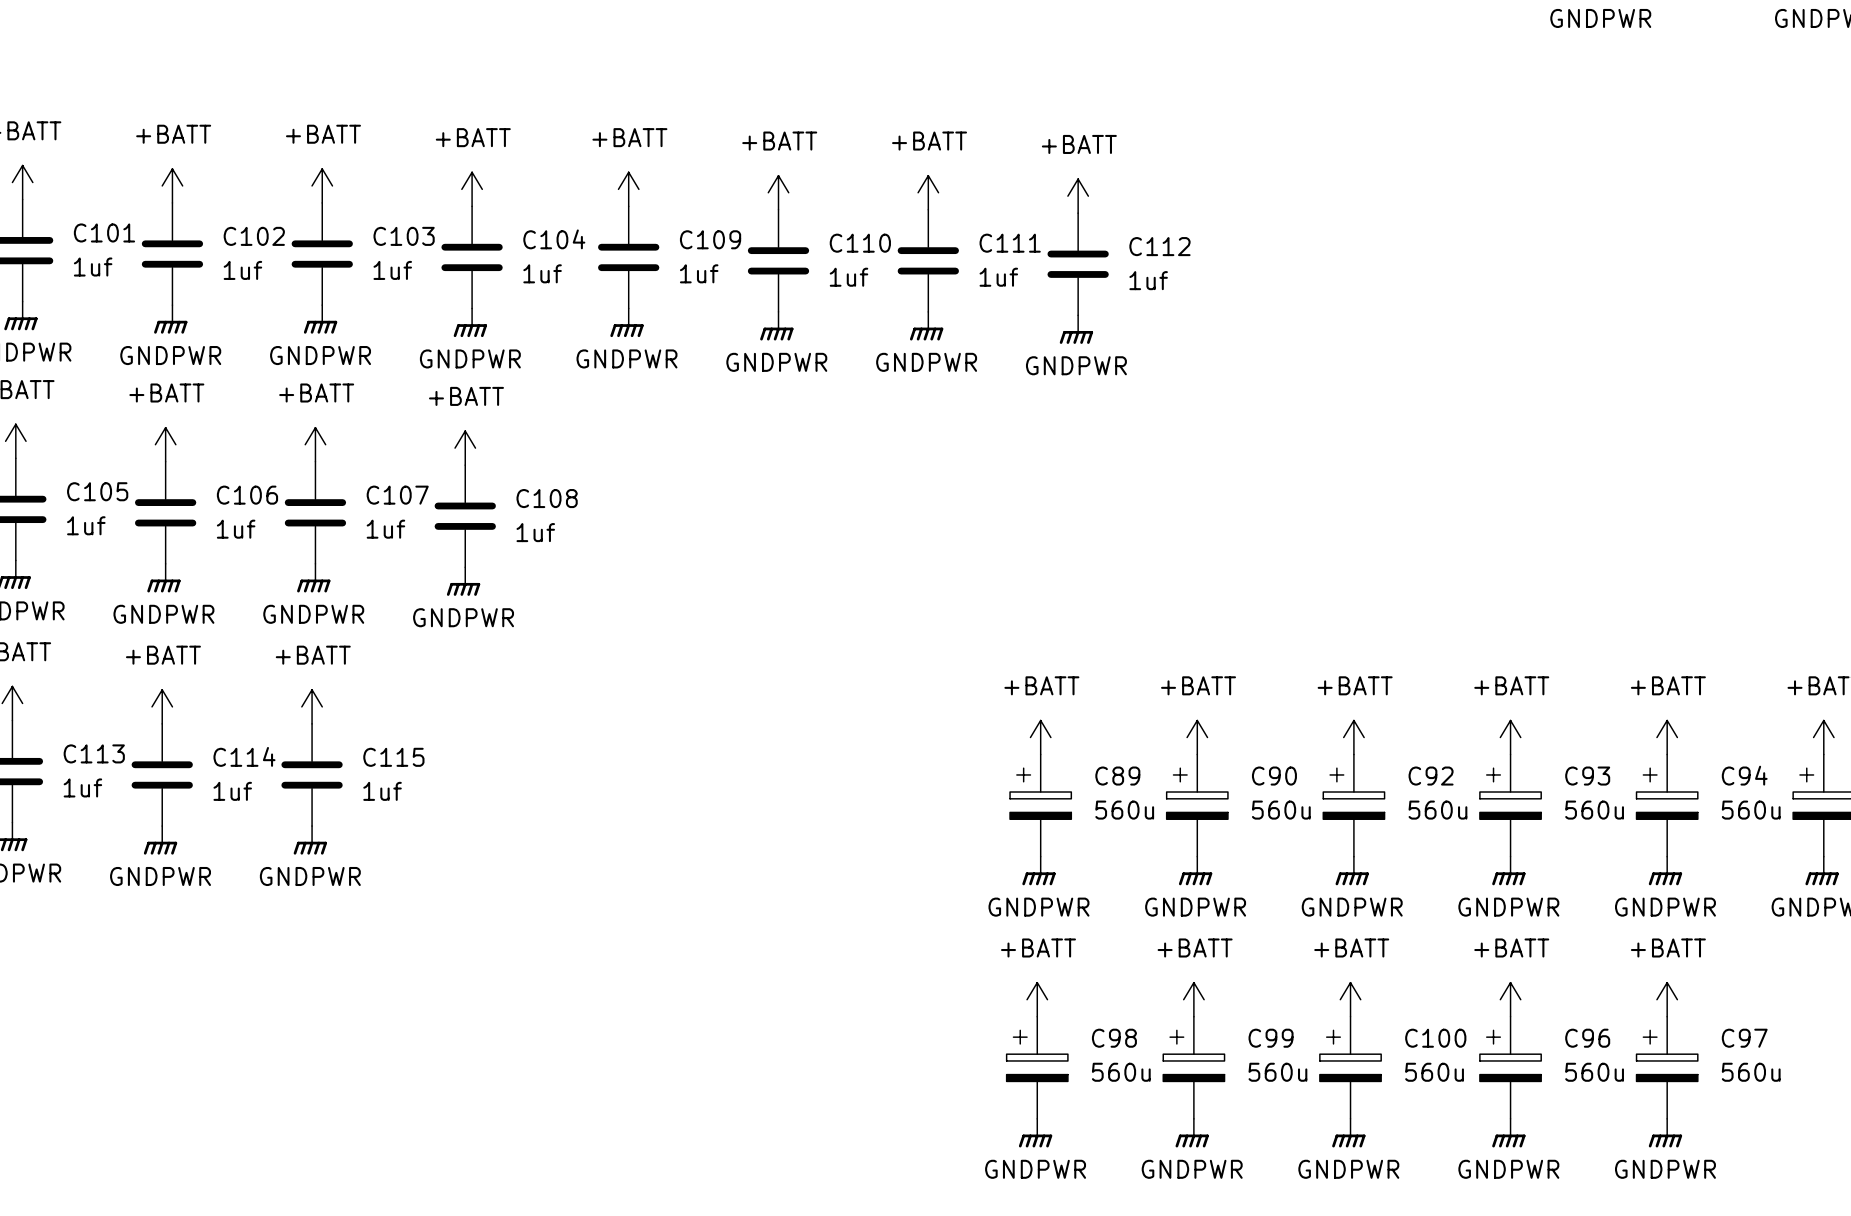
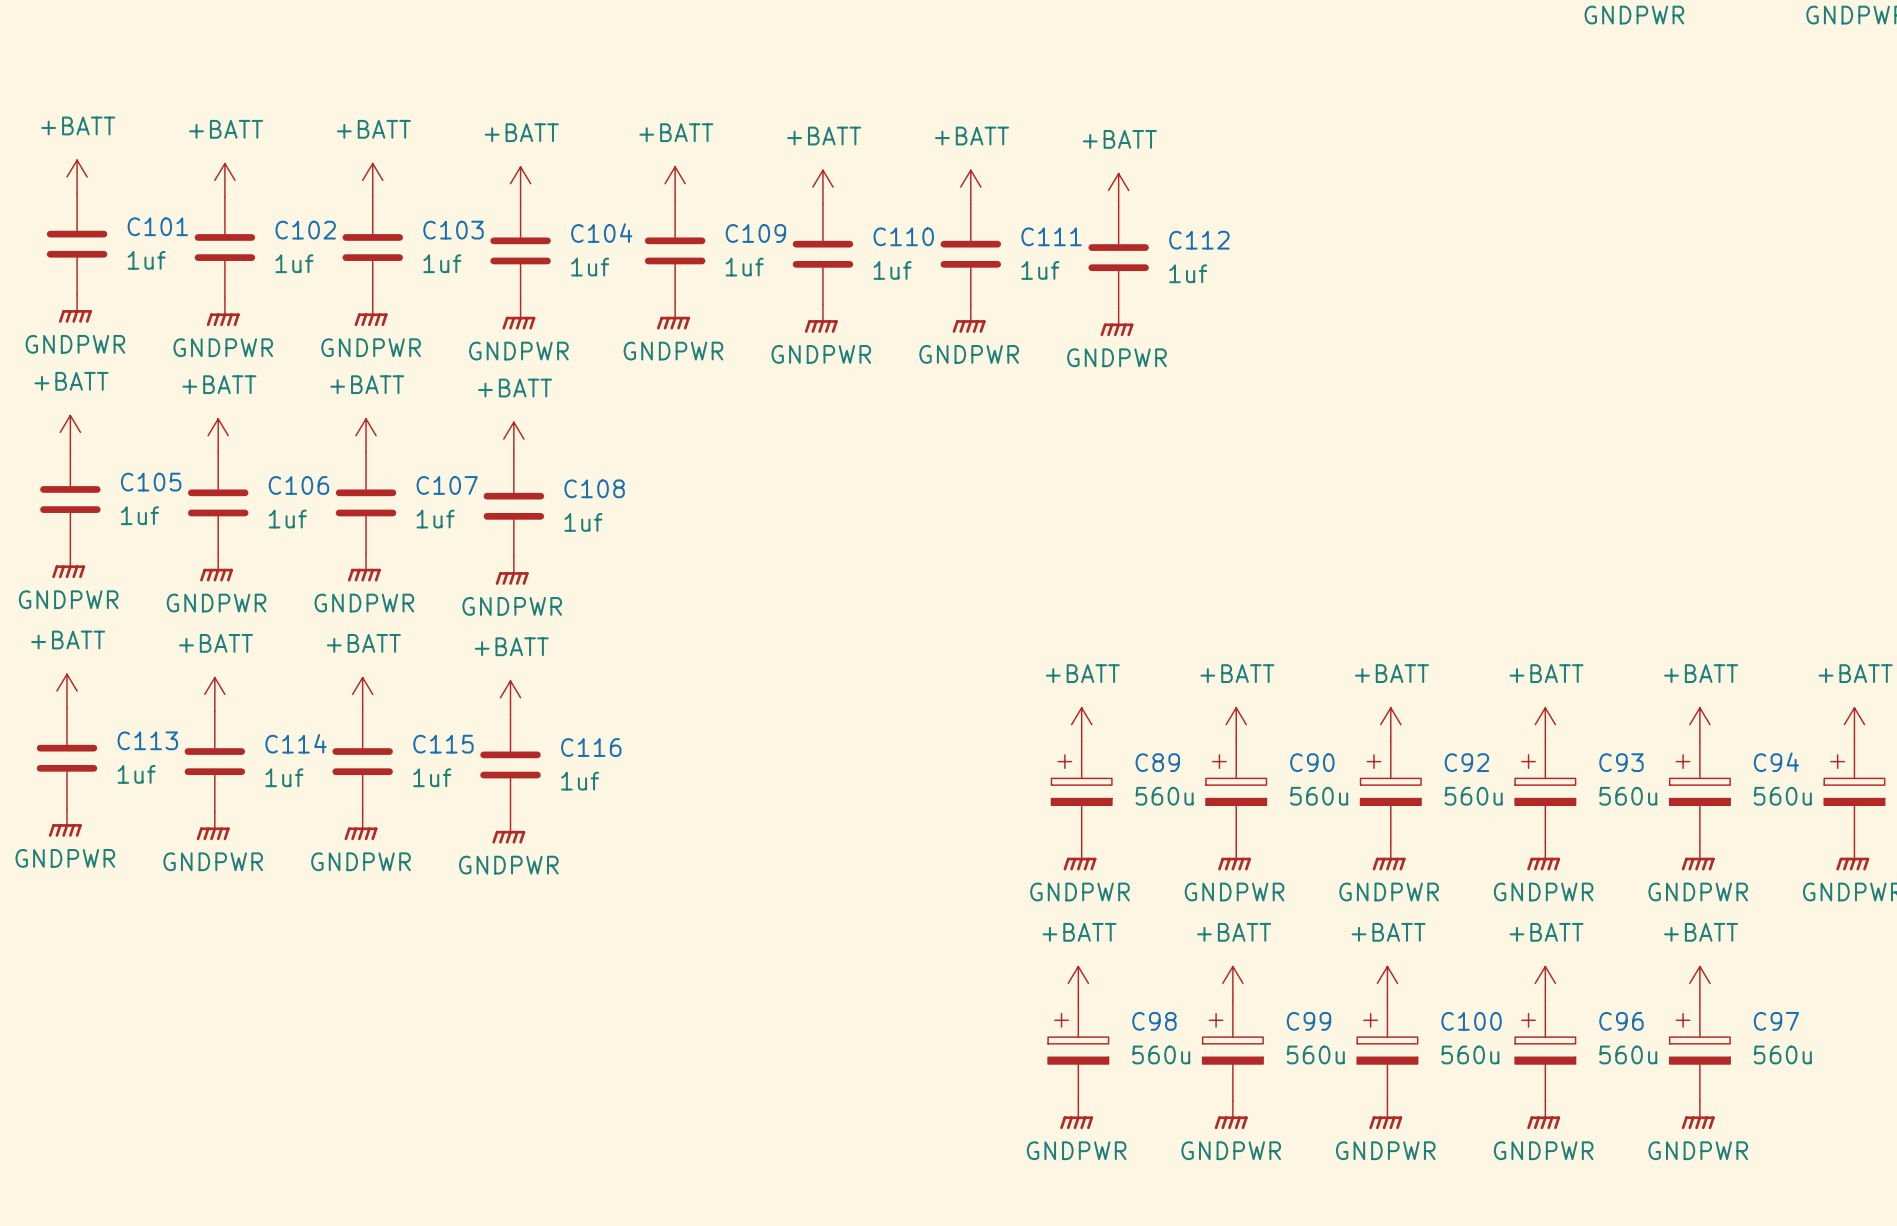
power symbol: none -> +BATT (510, 697)
C116: none -> 1uf (510, 764)
power symbol: none -> GNDPWR (508, 829)

